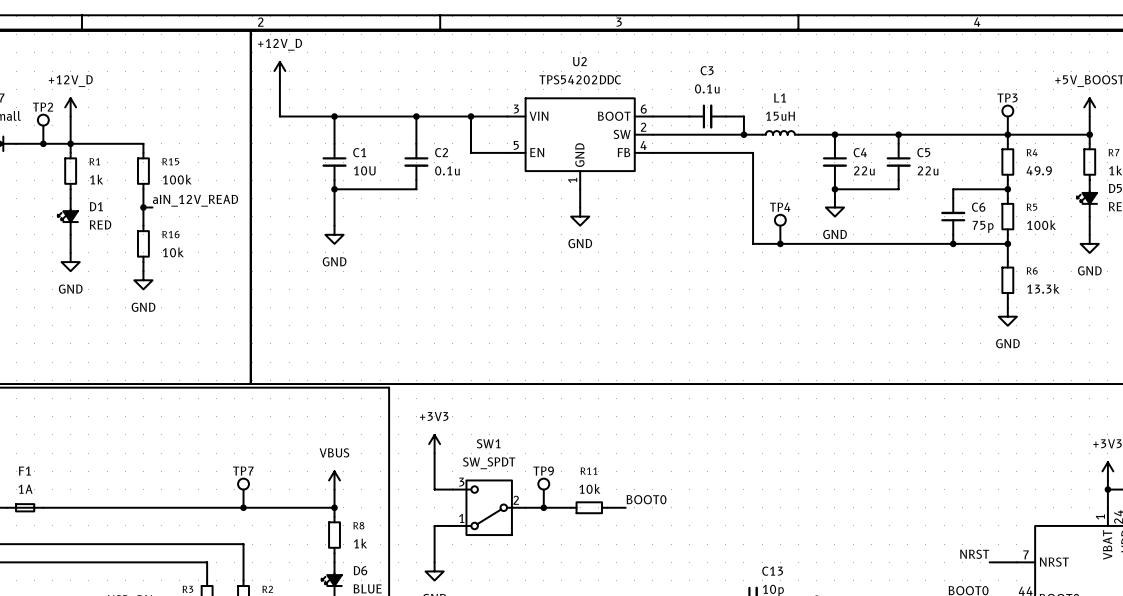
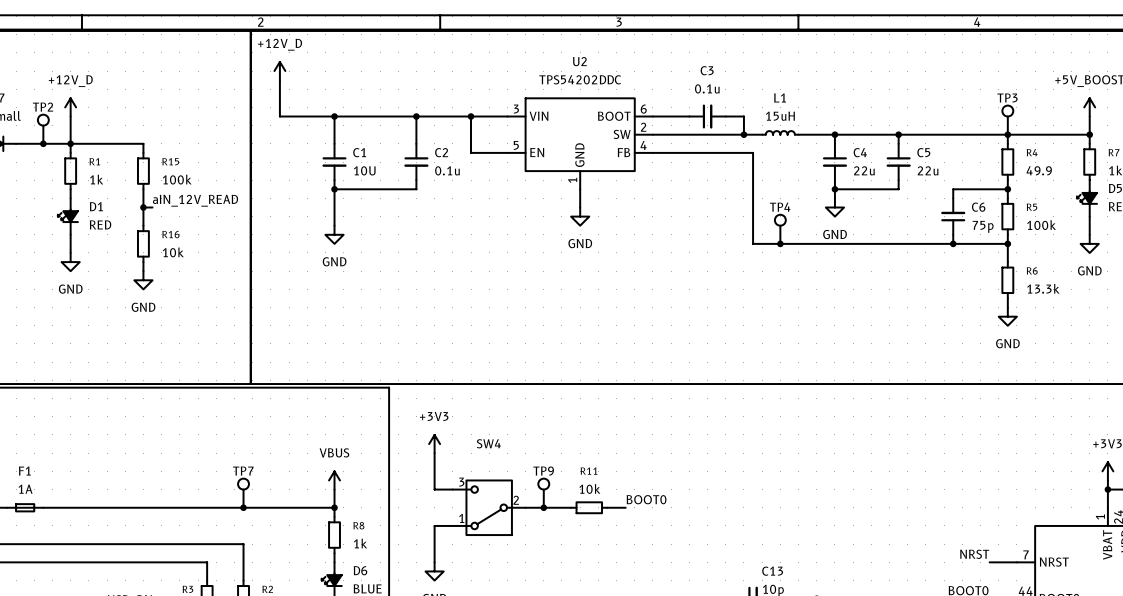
SW1 name: SW1 (488, 443) -> SW4 (488, 443)
SW1 value: SW_SPDT (489, 463) -> none

